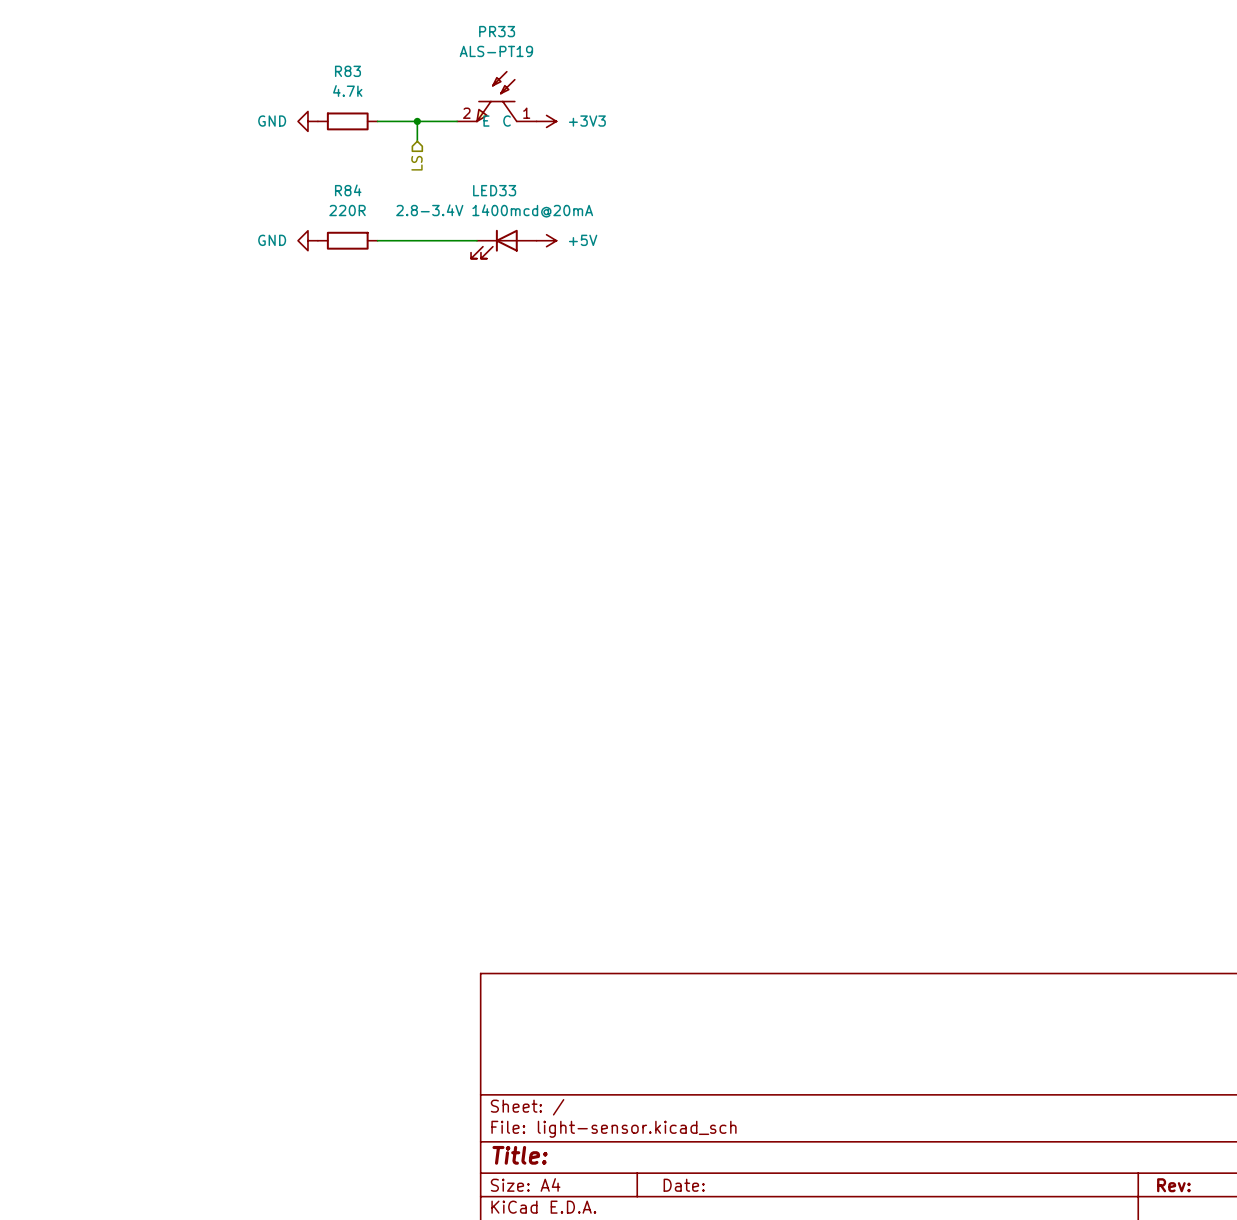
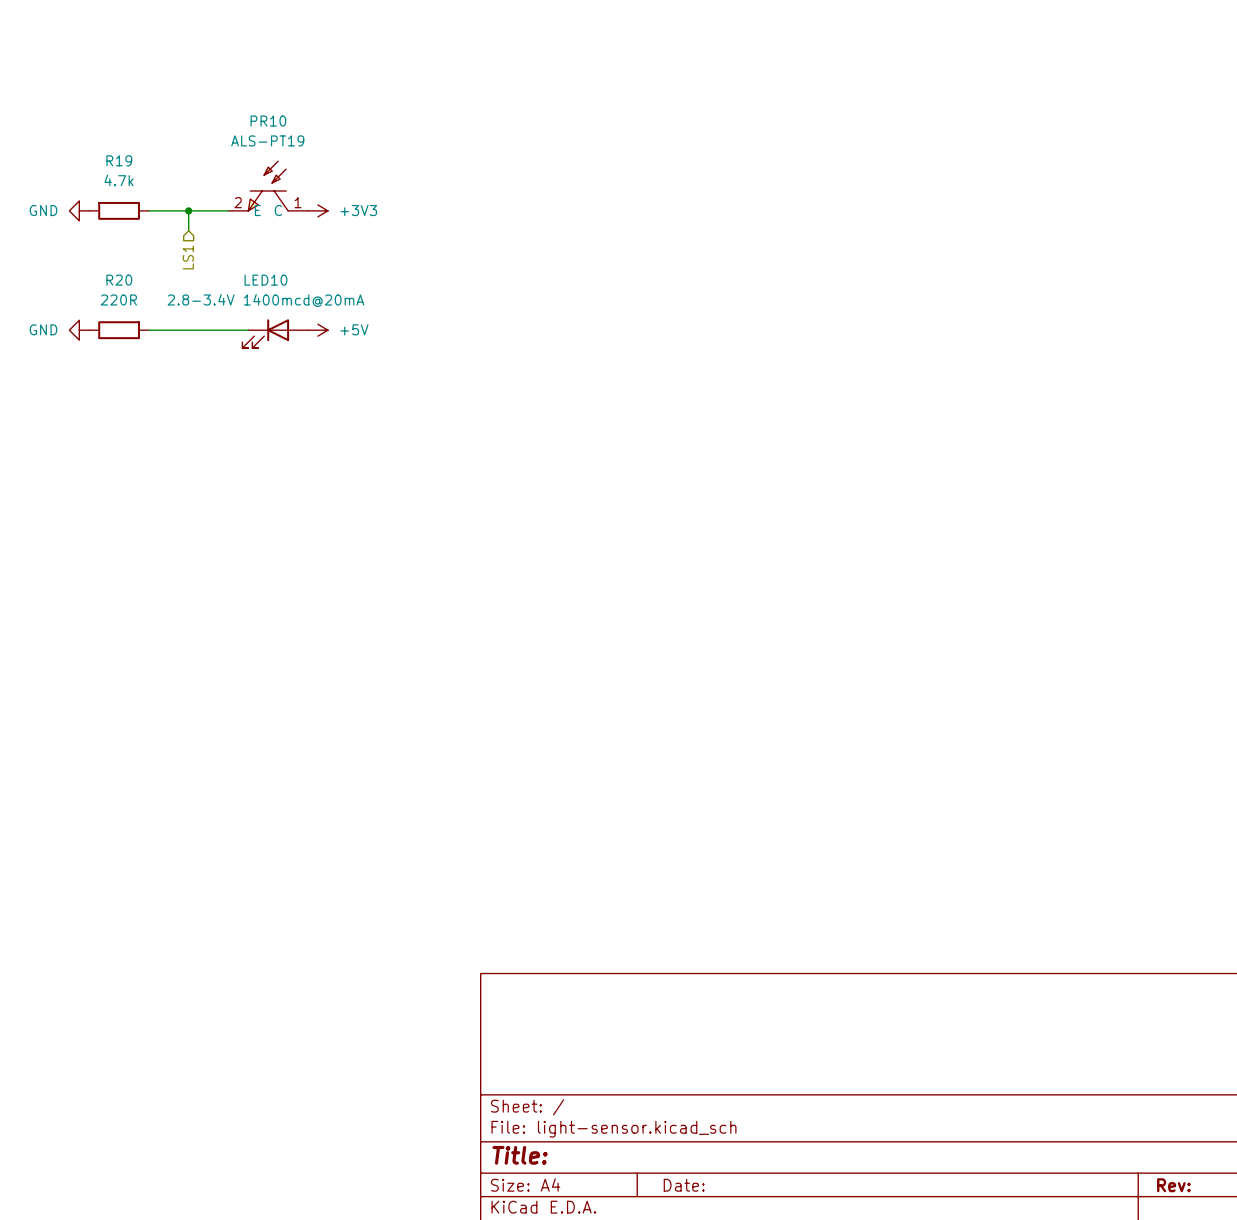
PR33: ALS-PT19 (496, 96) -> none
power symbol: GND (307, 121) -> none
R83: 4.7k (347, 121) -> none
wire: (377, 121) (457, 121) -> none
wire: (417, 121) (417, 141) -> none
junction: (417, 121) -> none
power symbol: +3V3 (546, 121) -> none
hierarchical label: LS (416, 163) -> none
PR10: none -> ALS-PT19 (268, 186)
power symbol: none -> GND (79, 210)
R19: none -> 4.7k (119, 210)
wire: none -> (148, 210) (228, 210)
wire: none -> (188, 210) (188, 230)
junction: none -> (188, 210)
power symbol: none -> +3V3 (317, 210)
power symbol: GND (307, 240) -> none
R84: 220R (347, 240) -> none
wire: (377, 240) (476, 240) -> none
power symbol: +5V (546, 240) -> none
LED33: 2.8-3.4V 1400mcd@20mA (503, 244) -> none
hierarchical label: none -> LS1 (188, 257)
power symbol: none -> GND (79, 330)
R20: none -> 220R (119, 330)
wire: none -> (148, 330) (248, 330)
power symbol: none -> +5V (317, 330)
LED10: none -> 2.8-3.4V 1400mcd@20mA (275, 333)

